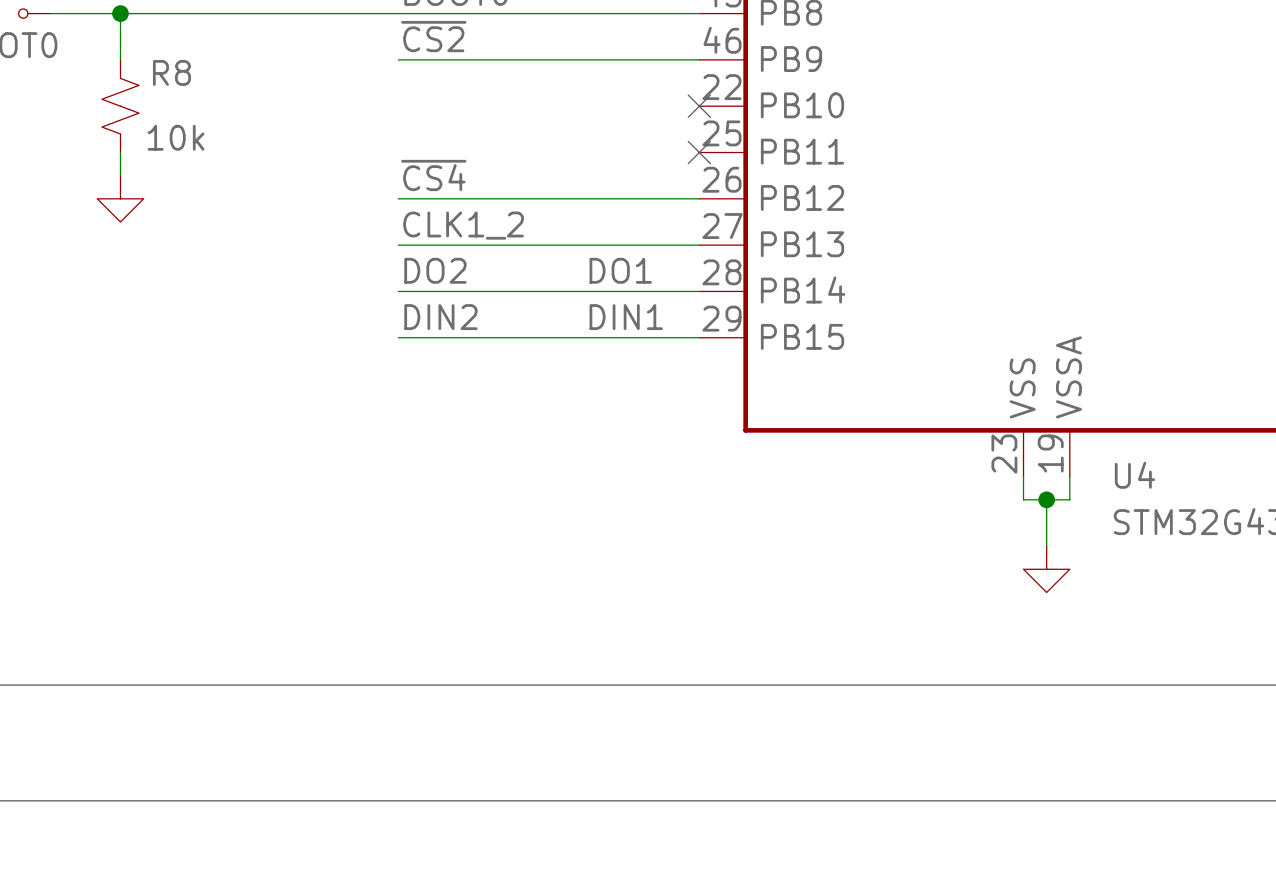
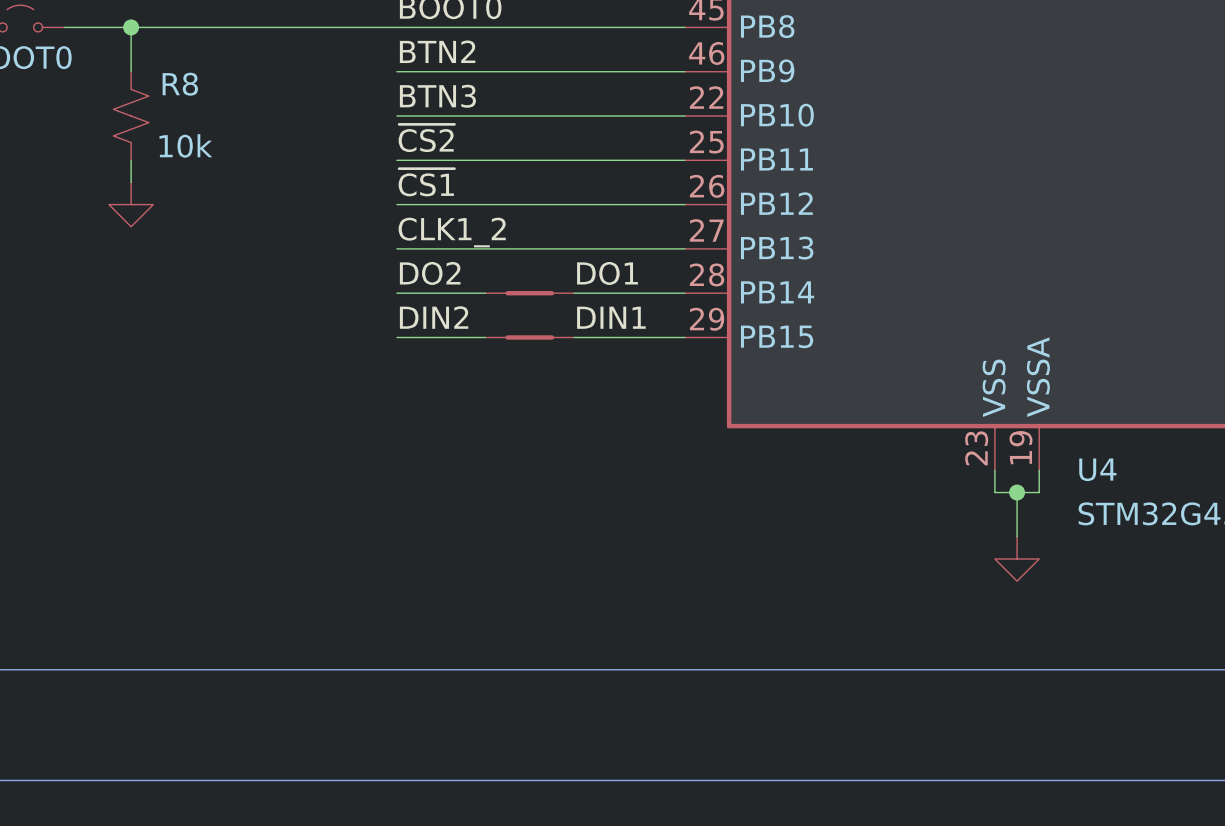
label: ~{CS2} (433, 36) -> BTN2 (437, 51)
label: none -> BTN3 (437, 96)
wire: none -> (396, 116) (684, 116)
no-connect mark: (699, 106) -> none
label: none -> ~{CS2} (426, 138)
wire: none -> (396, 160) (684, 160)
no-connect mark: (699, 152) -> none
label: ~{CS4} (433, 175) -> ~{CS1} (426, 182)
part: none -> (529, 293)
part: none -> (529, 337)

